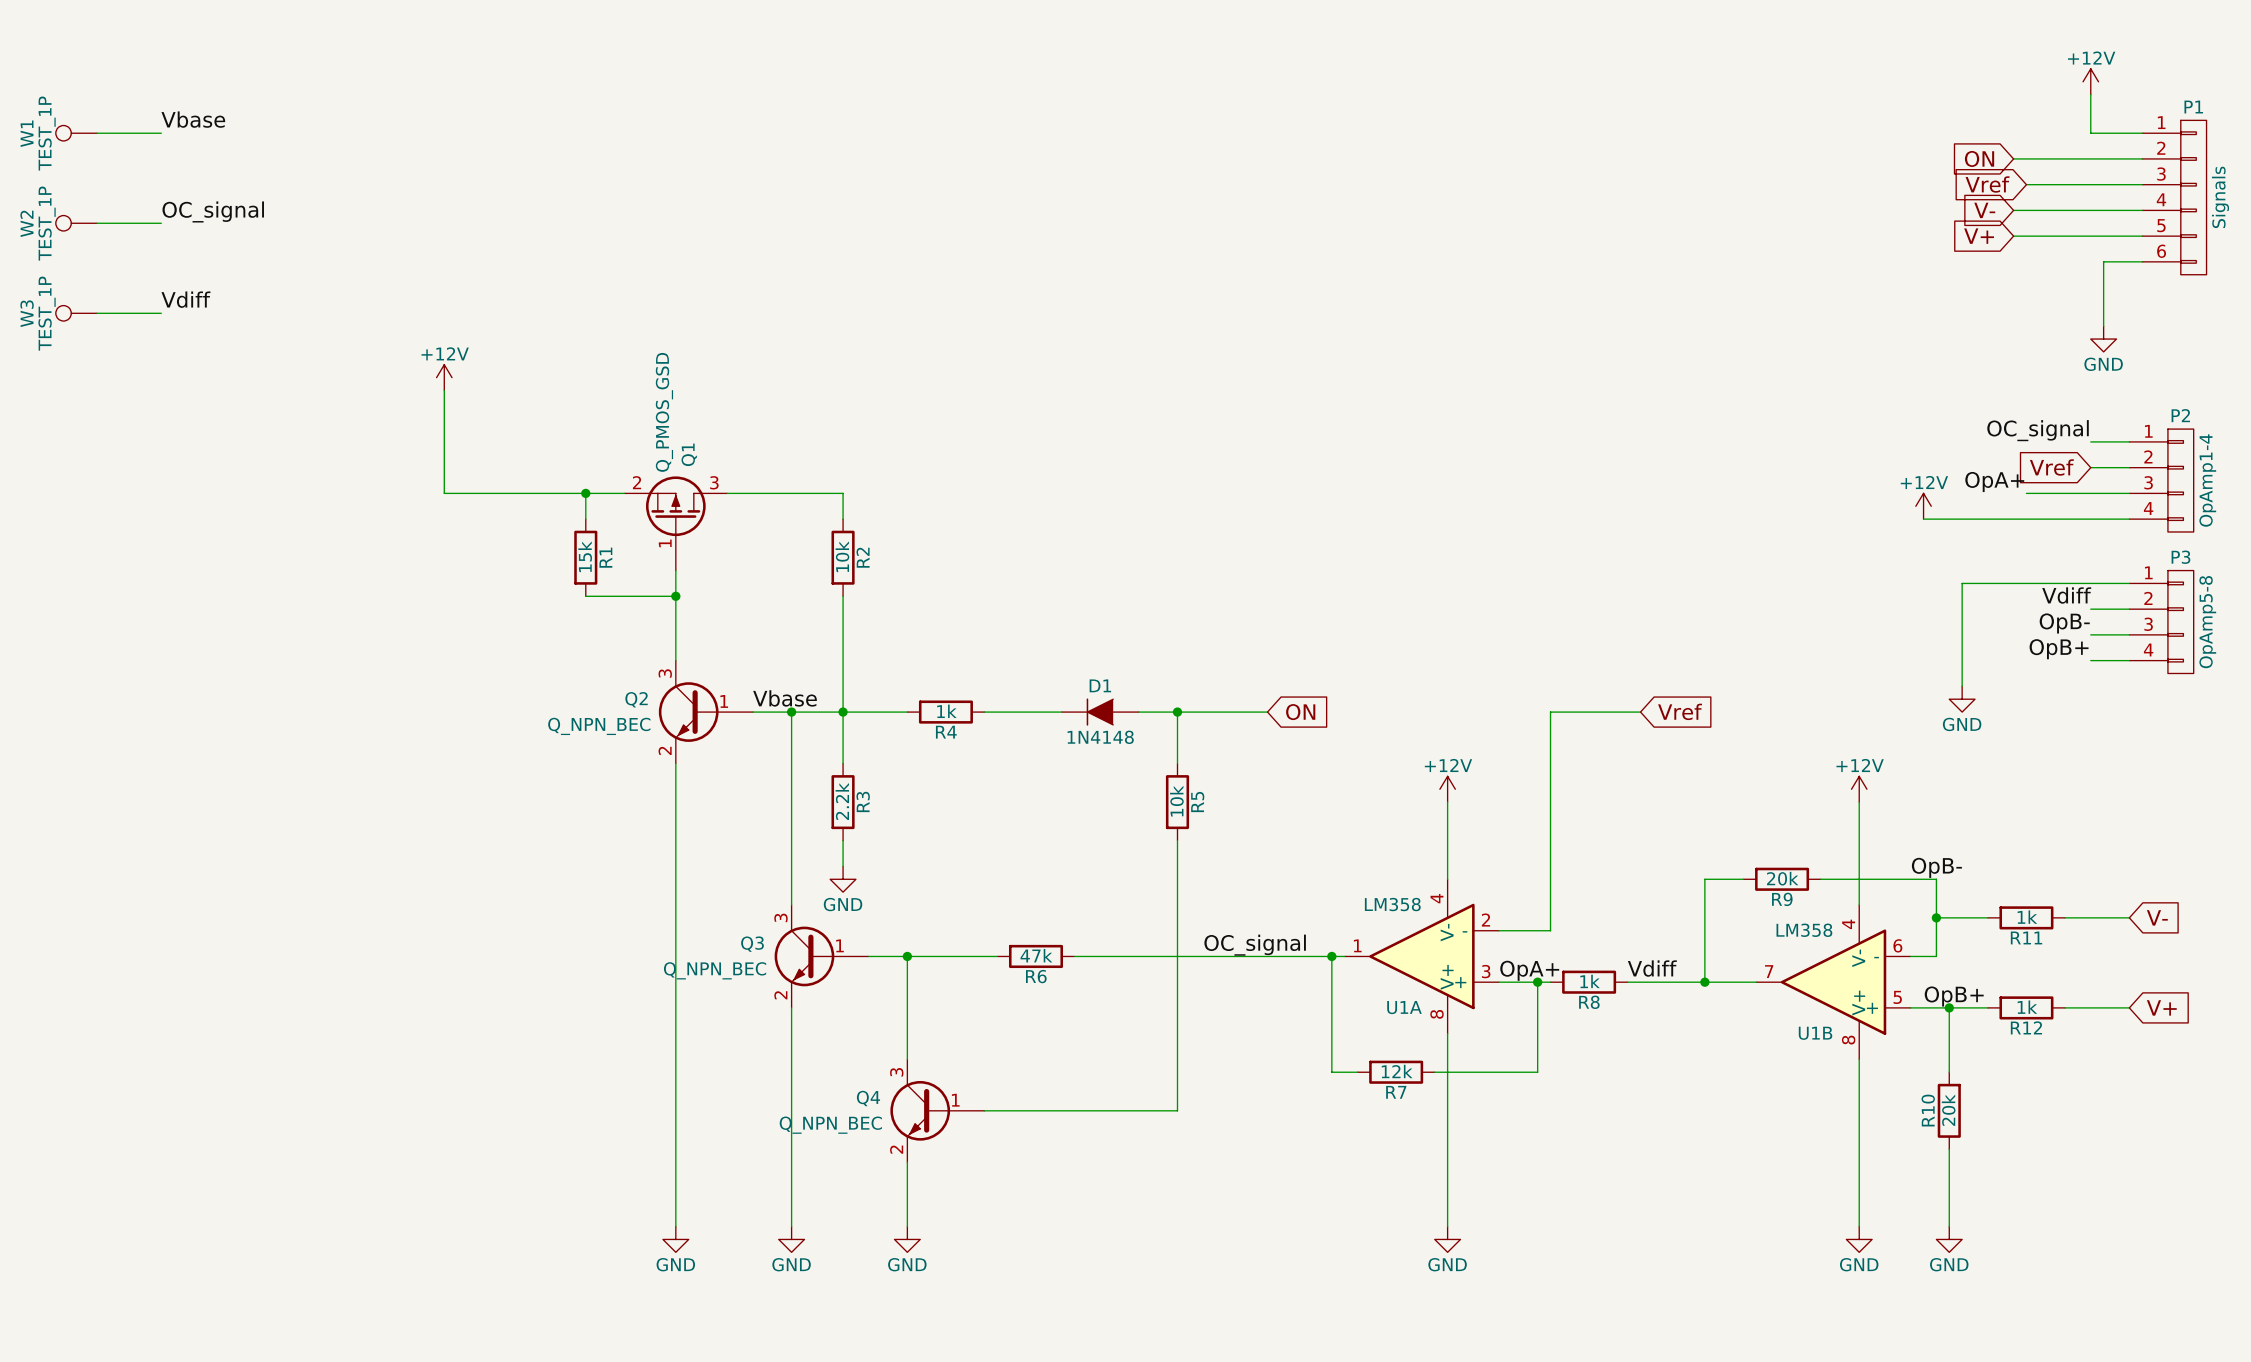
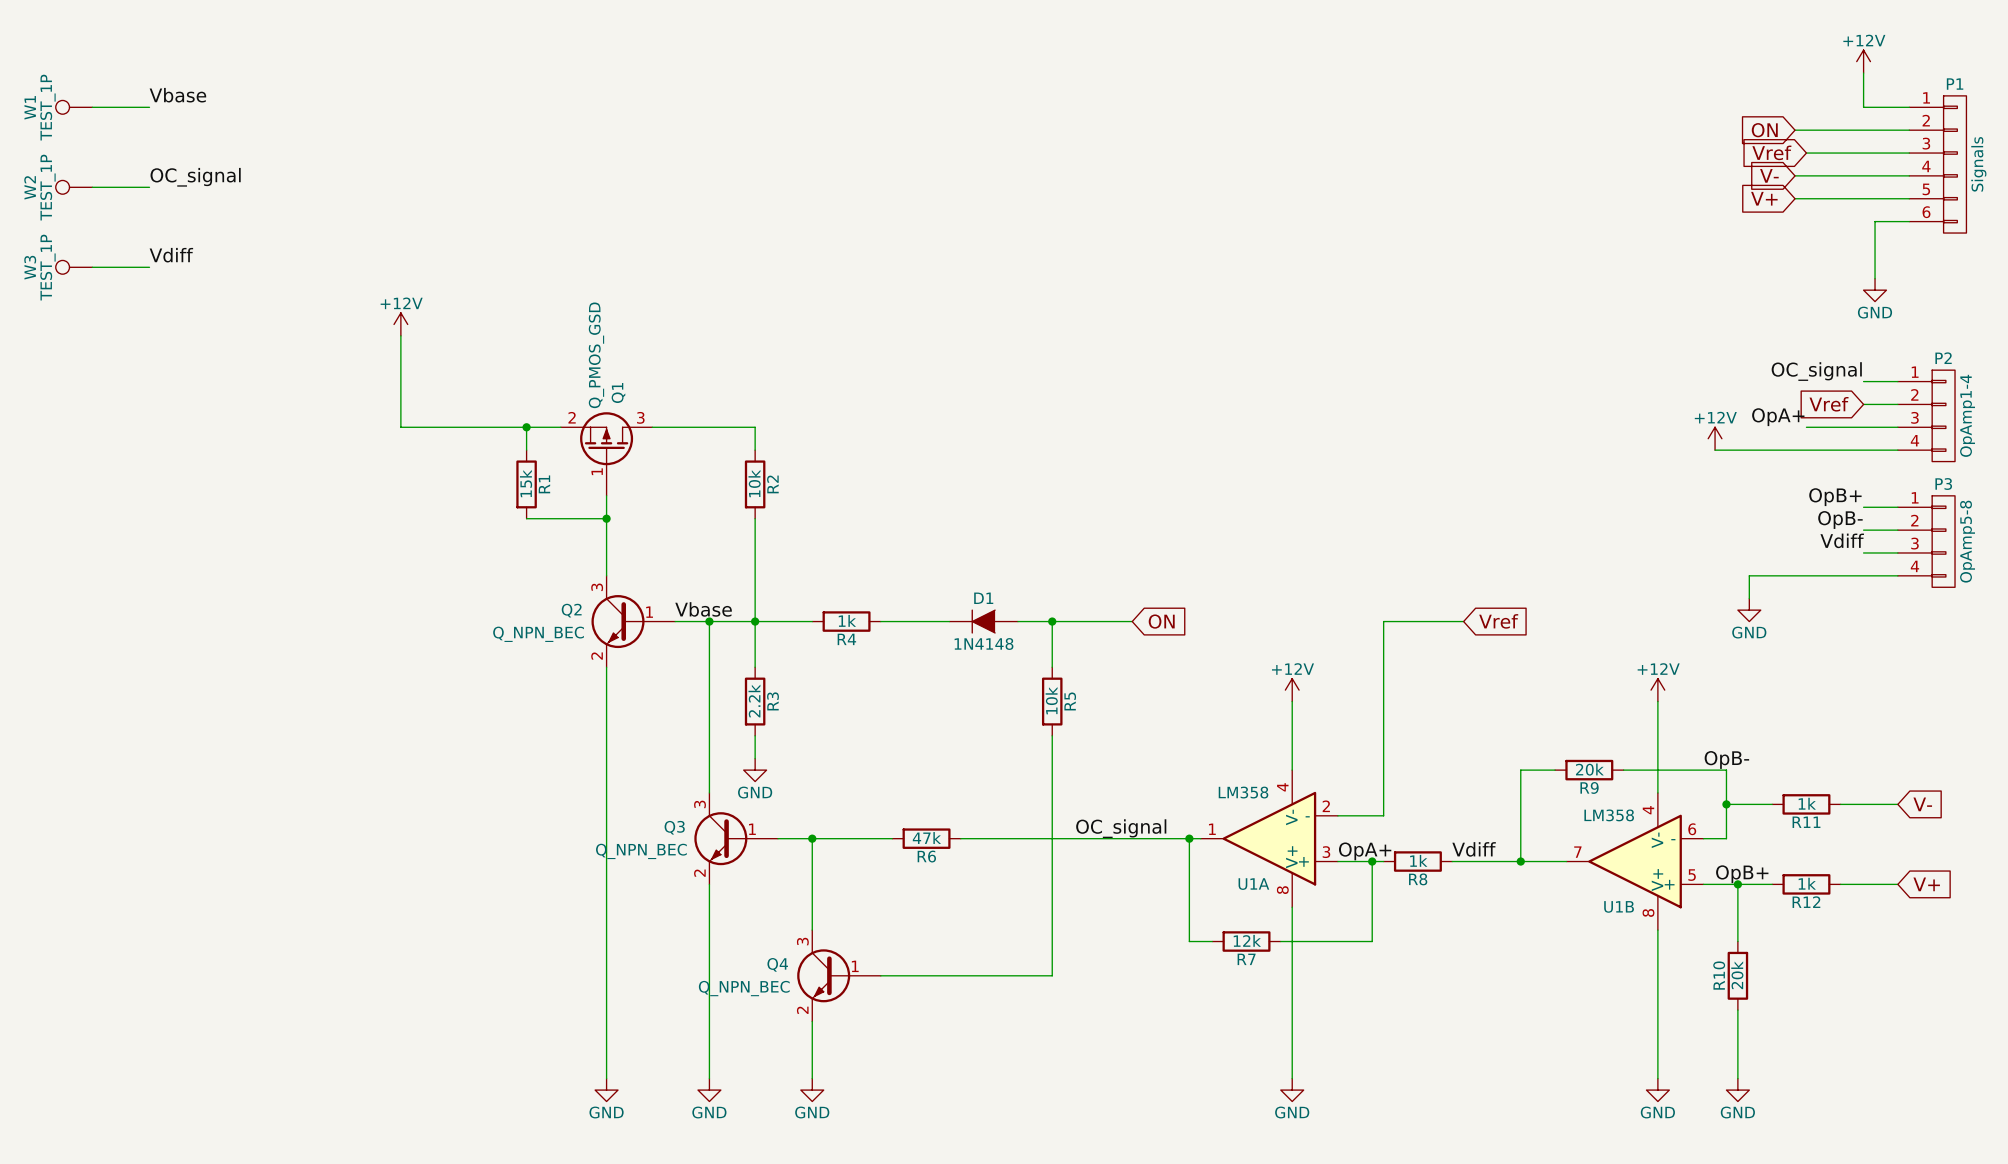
wire: (2090, 583) (1962, 583) (1962, 660) -> (1863, 575) (1749, 575)
label: Vdiff (2066, 595) -> OpB- (1840, 520)
label: OpB- (2064, 623) -> Vdiff (1842, 540)
label position: OpB+ (2059, 649) -> OpB+ (1835, 497)

